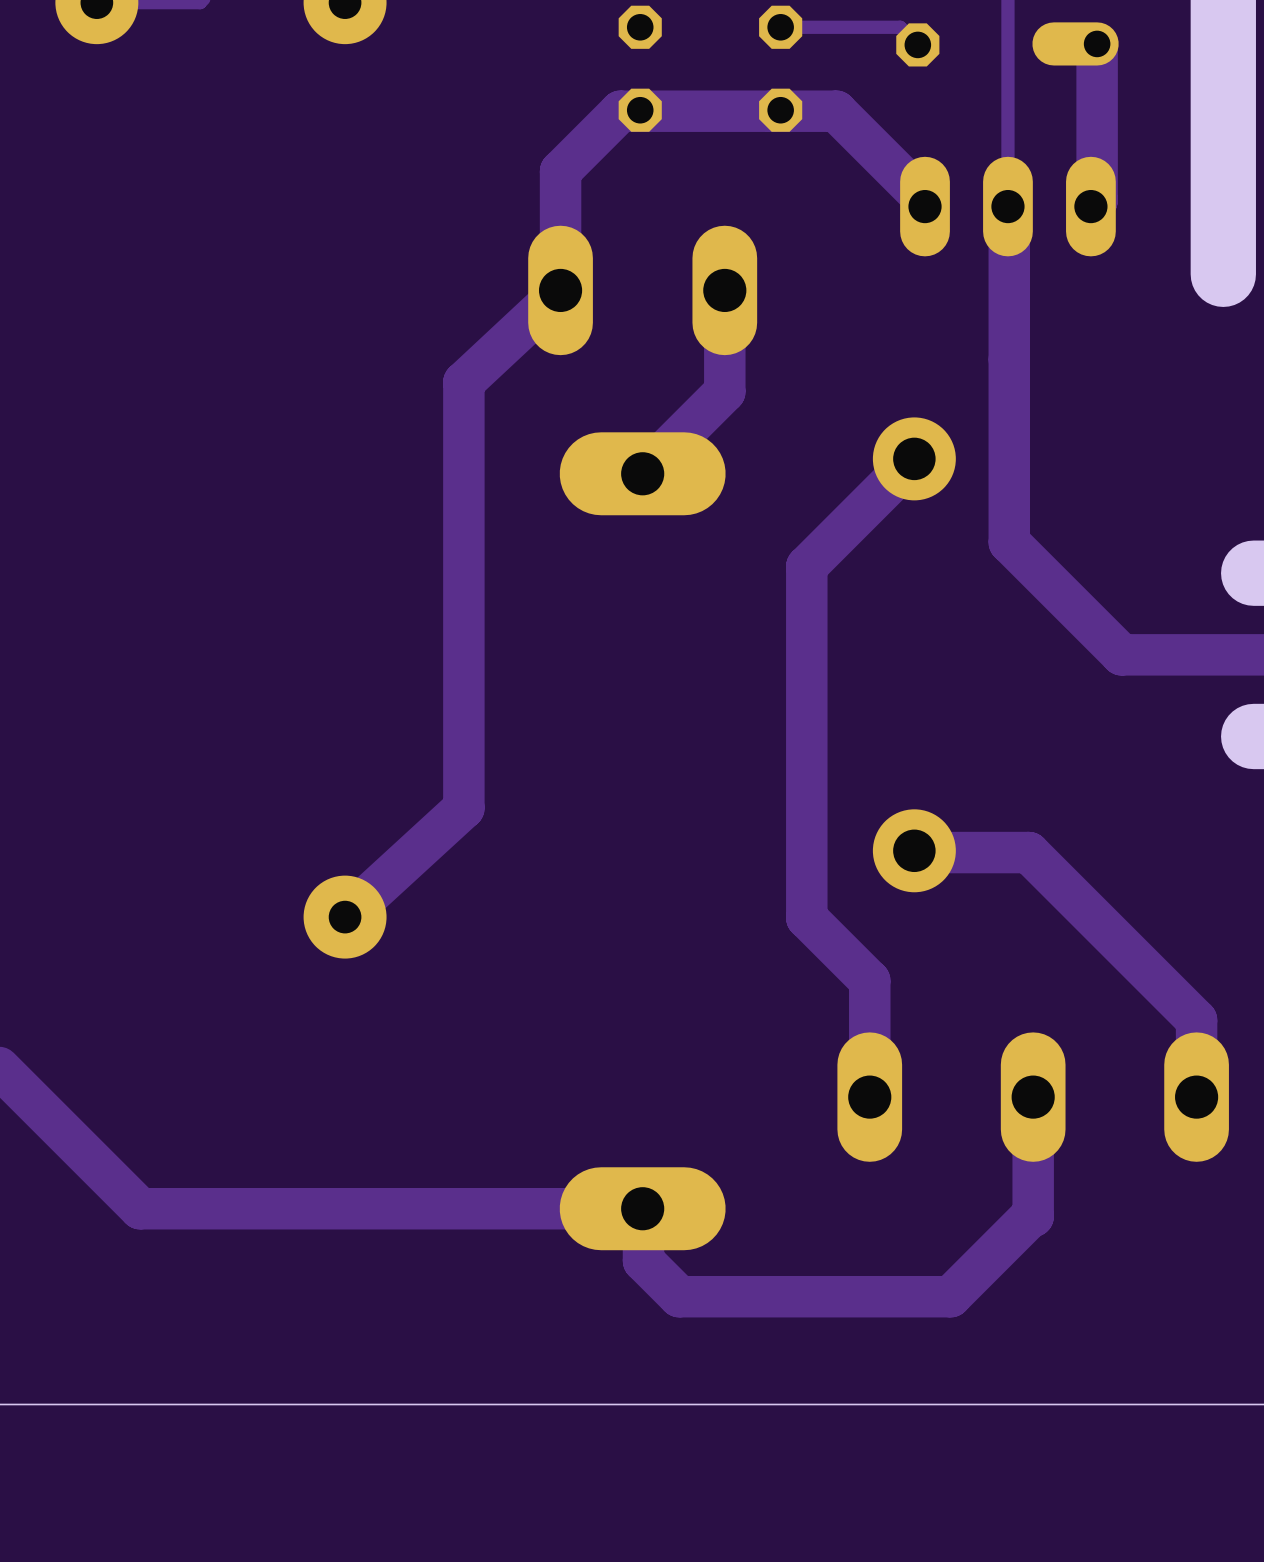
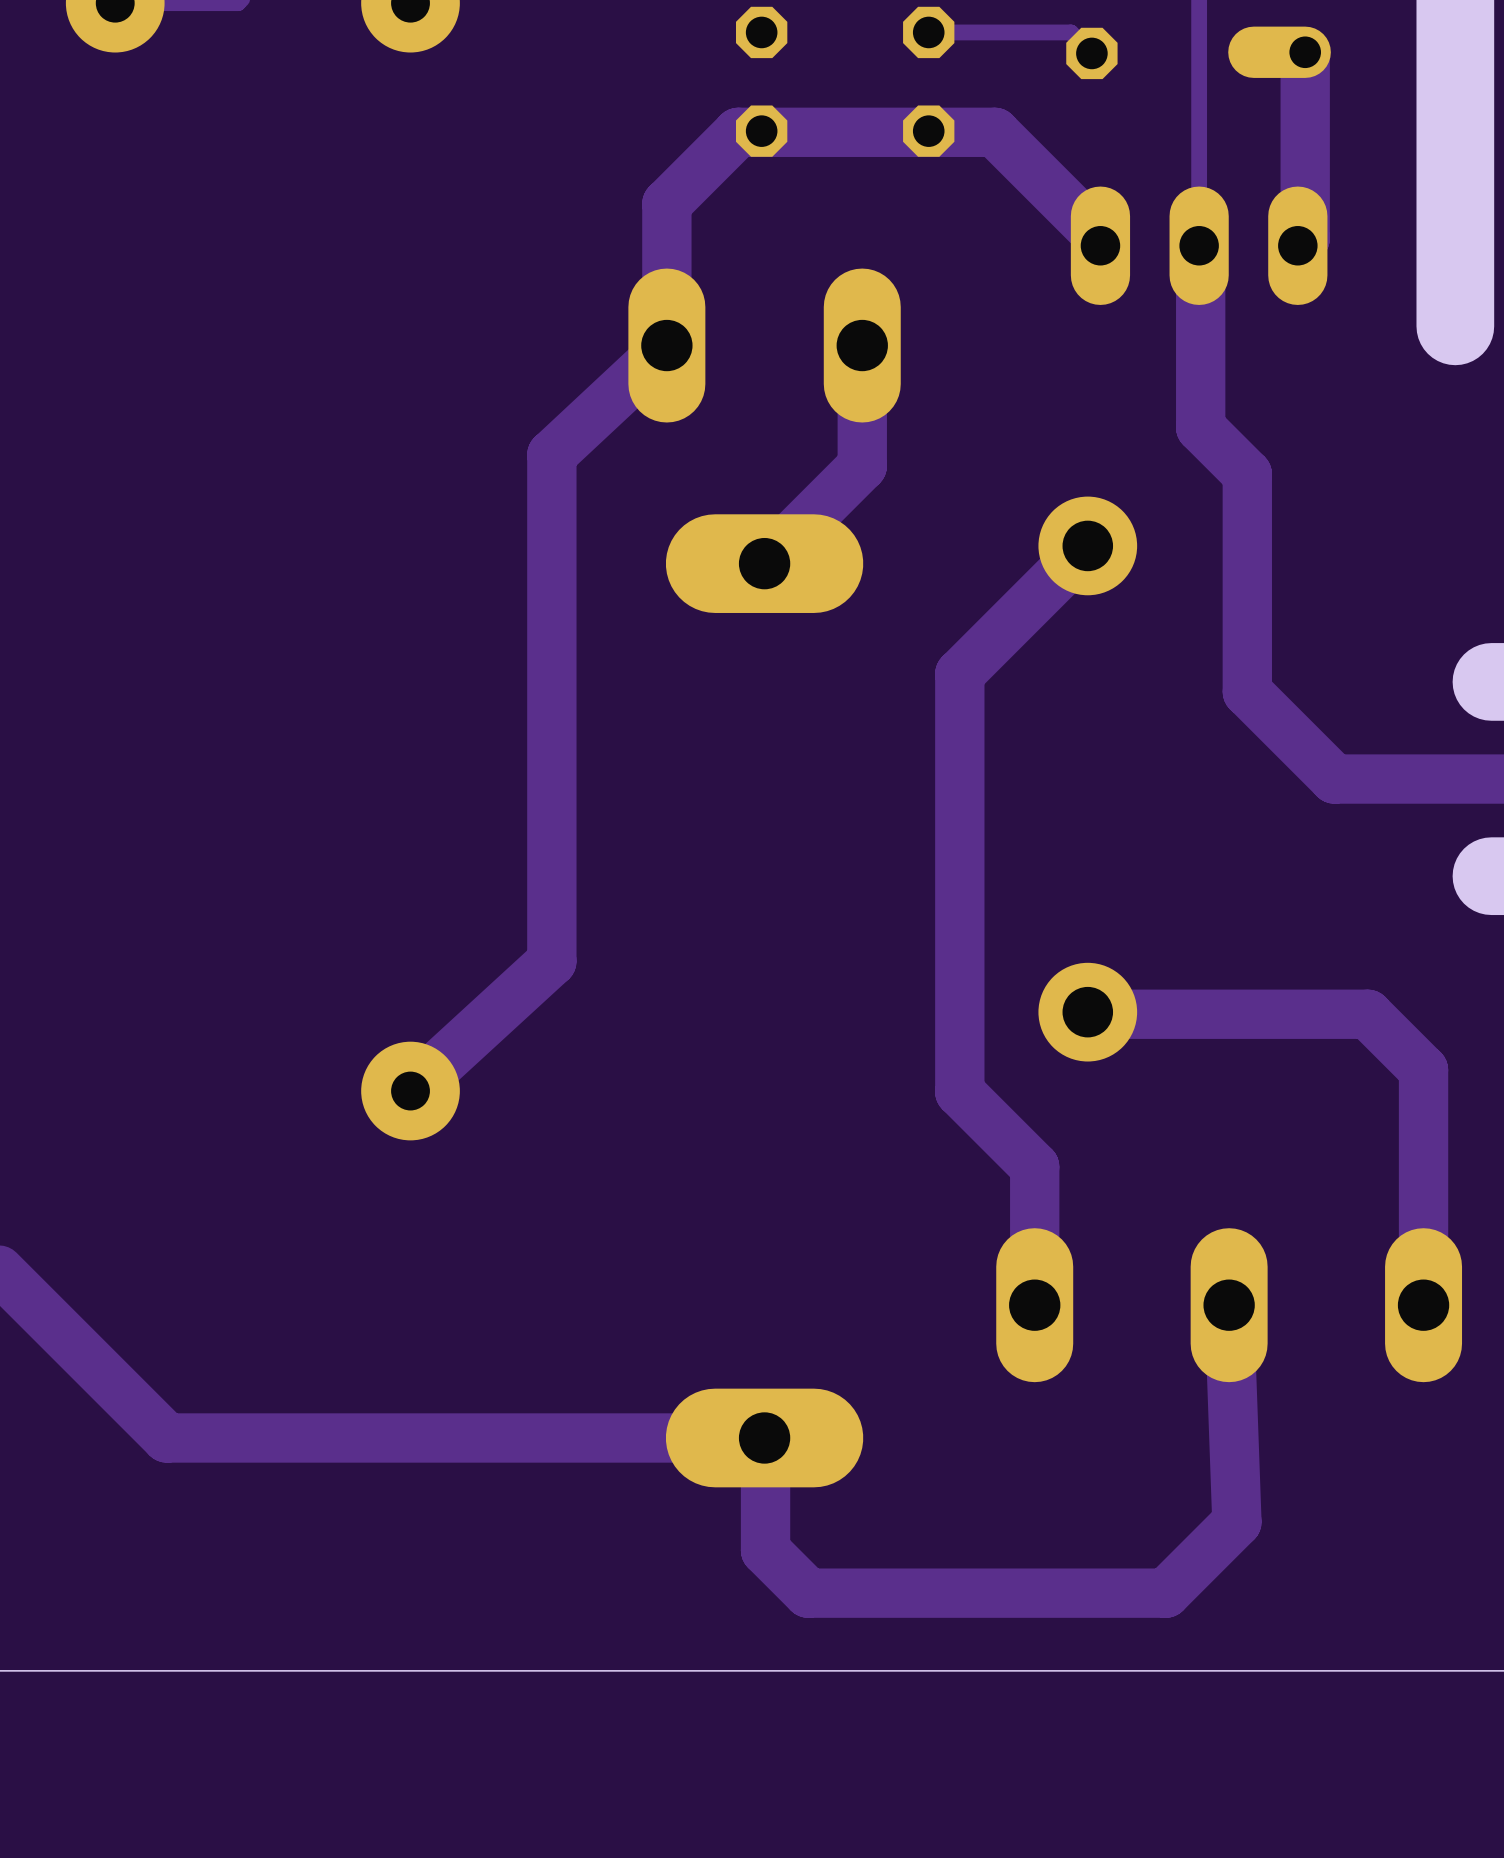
track: (1009, 359) (1009, 542) (1048, 581) -> (1200, 427) (1247, 474) (1247, 691)
track: (1028, 852) (1196, 1020) -> (1224, 1014) (1367, 1014) (1423, 1070) (1423, 1213)
track: (1033, 1097) (1033, 1216) (1030, 1216) (950, 1296) (679, 1296) (643, 1260) -> (1229, 1305) (1236, 1521) (1165, 1593) (808, 1593) (765, 1550) (765, 1499)

